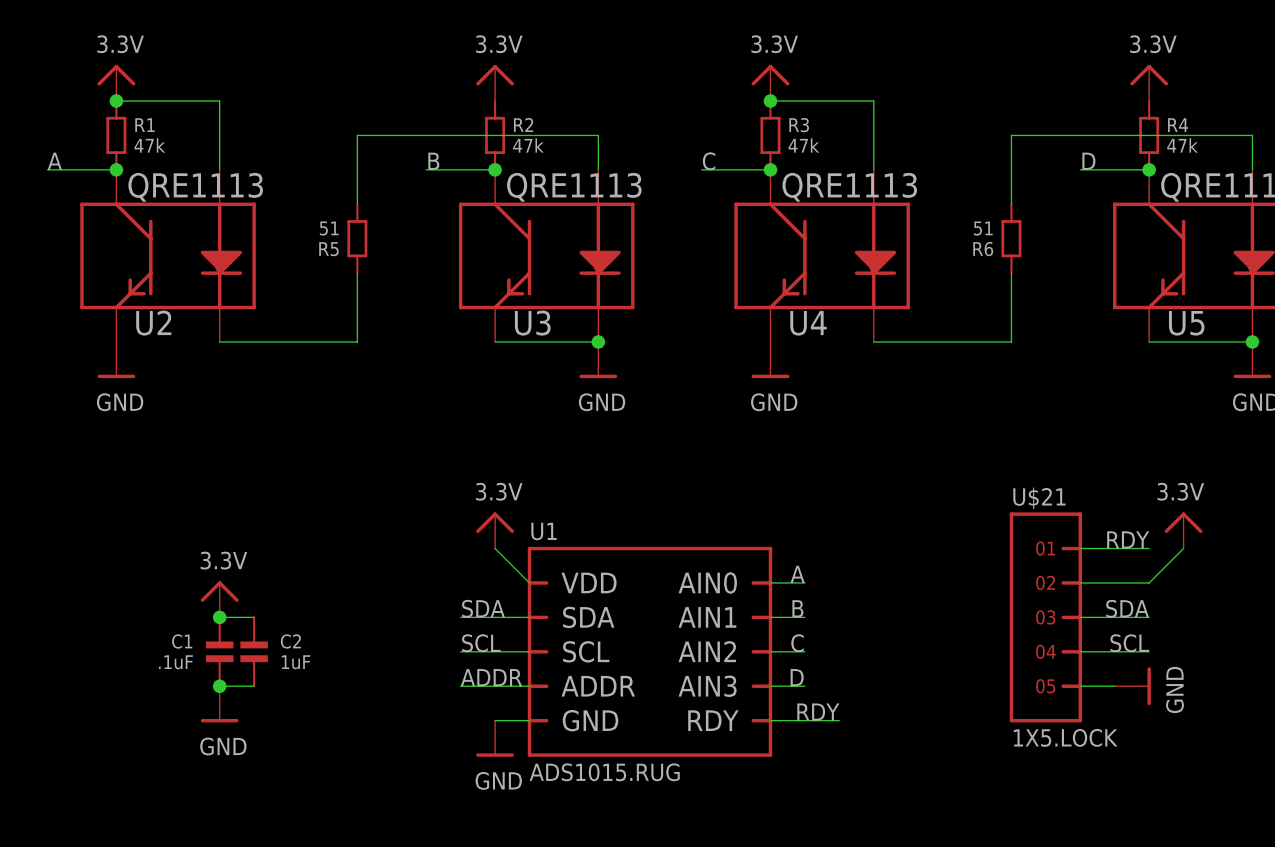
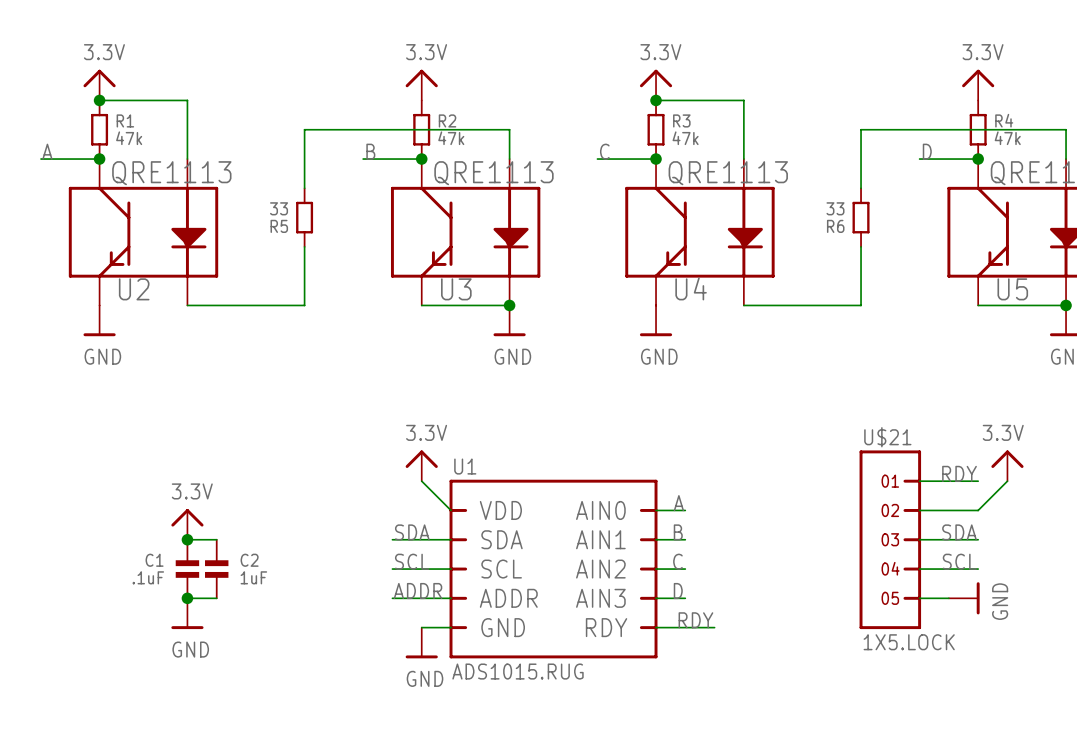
R5 value: 51 (329, 228) -> 33 (279, 208)
R6 value: 51 (983, 228) -> 33 (835, 208)

